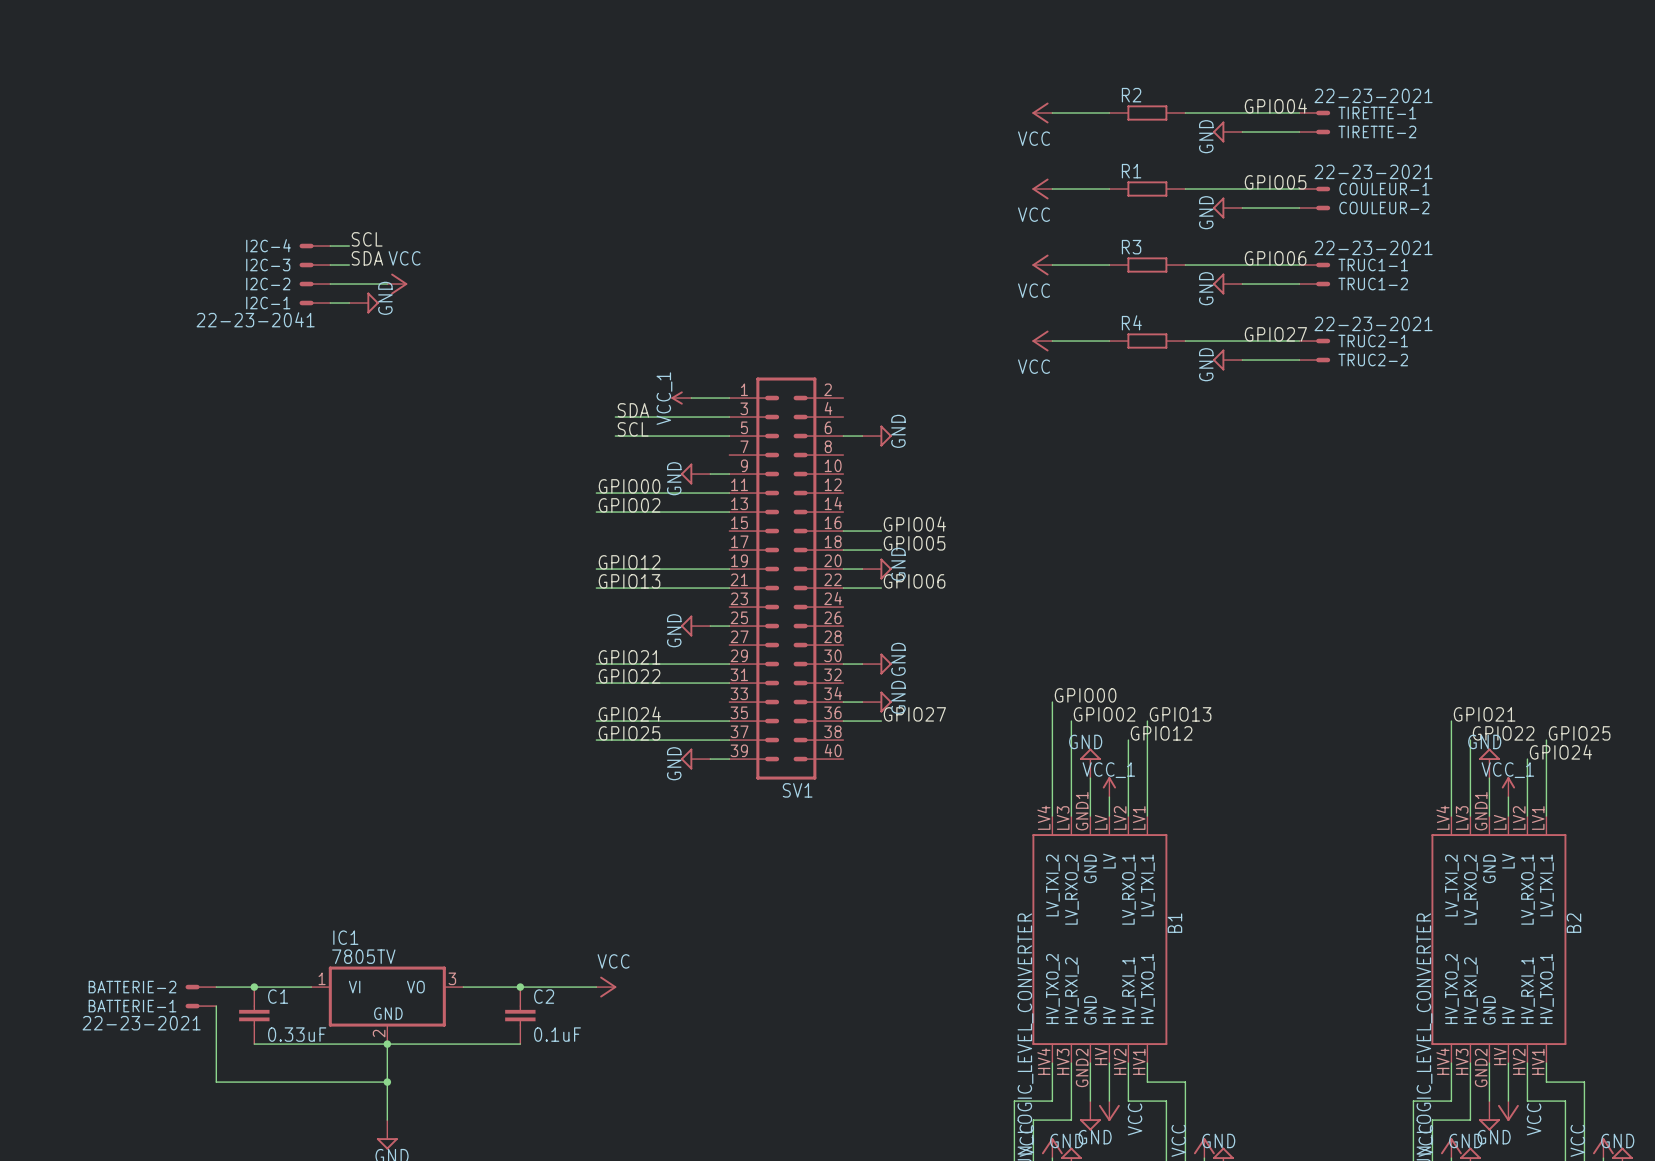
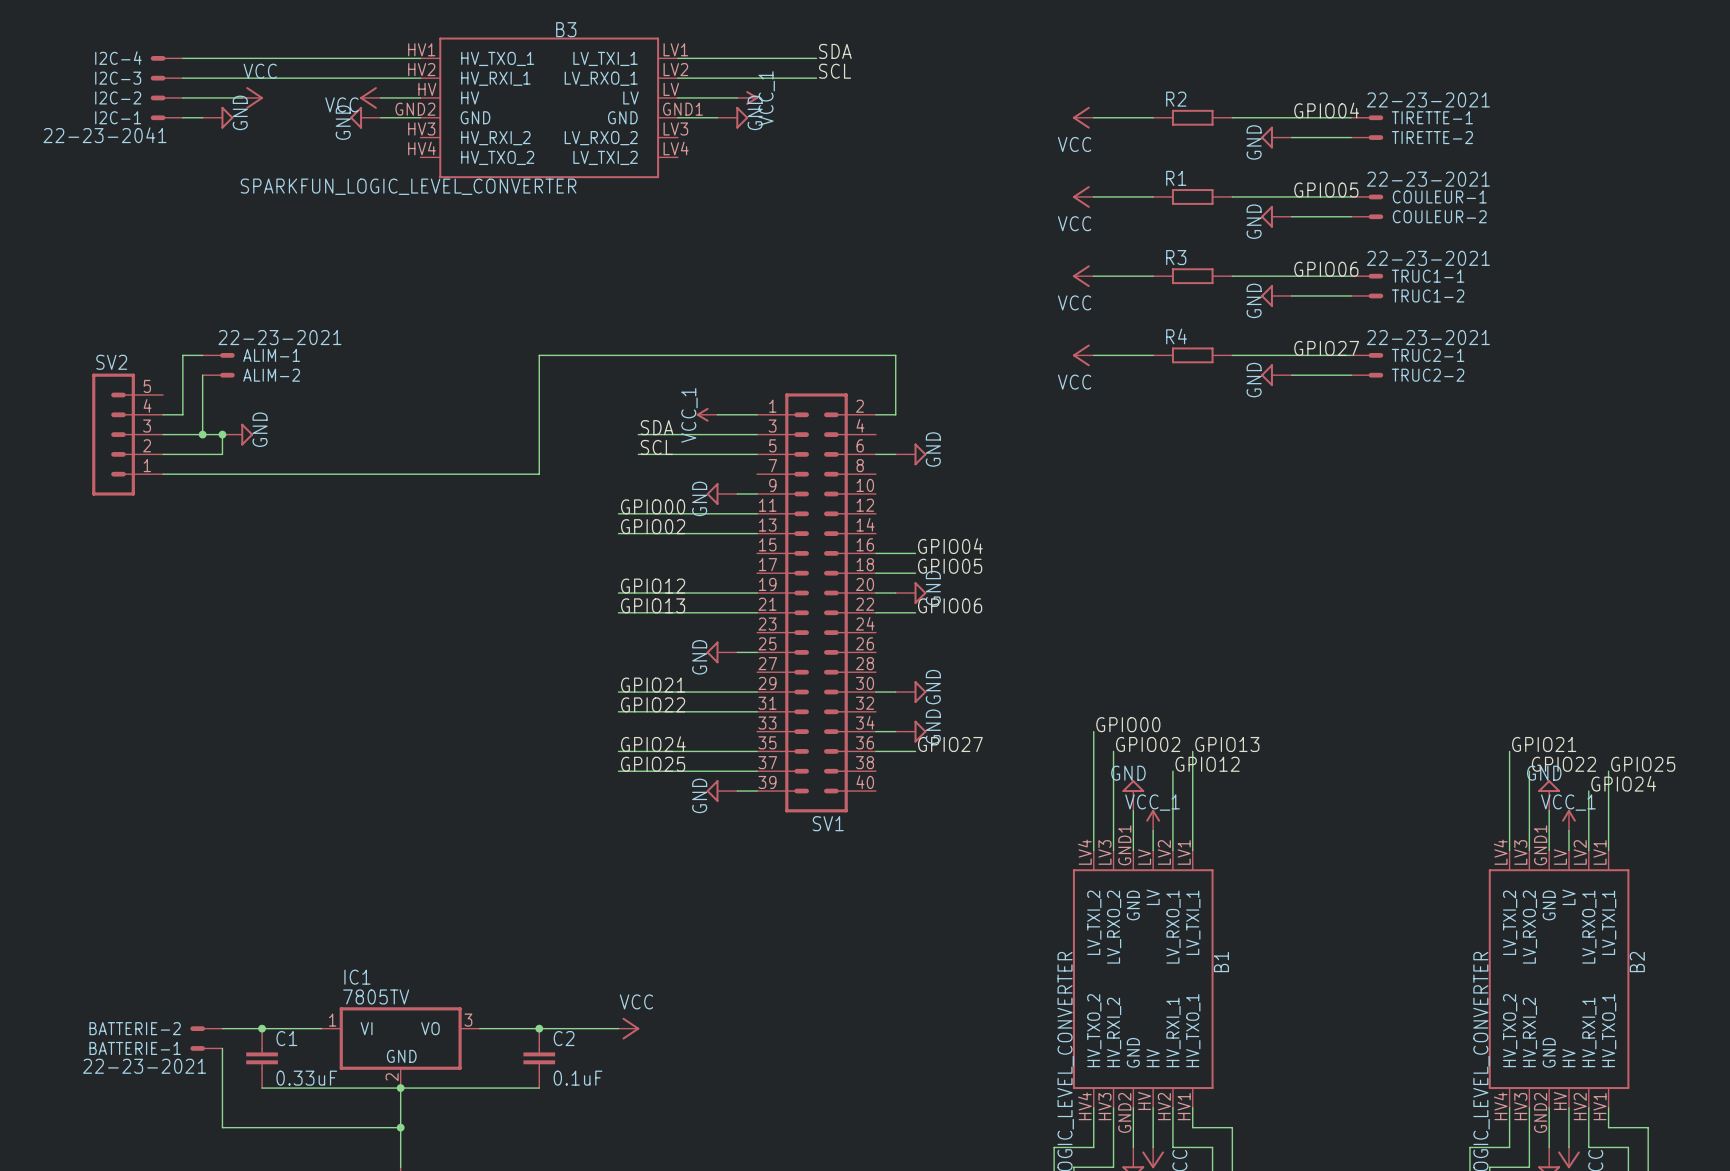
label: none -> SDA (835, 51)
wire: none -> (182, 58) (420, 58)
wire: none -> (677, 58) (816, 58)
label: none -> SCL (835, 71)
wire: none -> (182, 78) (420, 78)
wire: none -> (677, 78) (816, 78)
wire: none -> (182, 97) (242, 97)
power symbol: none -> VCC (252, 97)
power symbol: none -> VCC (370, 97)
wire: none -> (380, 97) (420, 97)
wire: none -> (677, 97) (737, 97)
power symbol: none -> VCC_1 (747, 97)
B3: none -> SPARKFUN_LOGIC_LEVEL_CONVERTER (549, 107)
wire: none -> (182, 117) (202, 117)
power symbol: none -> GND (218, 117)
power symbol: none -> GND (365, 117)
wire: none -> (380, 117) (420, 117)
wire: none -> (677, 117) (717, 117)
power symbol: none -> GND (732, 117)
label: SCL (367, 239) -> none
I2C-4 position: (314, 246) -> (166, 58)
wire: (330, 246) (349, 246) -> none
label: SDA (367, 258) -> none
I2C-3 position: (314, 265) -> (166, 78)
wire: (330, 265) (349, 265) -> none
I2C-2 position: (314, 284) -> (166, 97)
wire: (330, 284) (387, 284) -> none
power symbol: VCC (397, 284) -> none
I2C-1 position: (314, 303) -> (166, 117)
wire: (330, 303) (349, 303) -> none
power symbol: GND (364, 303) -> none
wire: none -> (202, 355) (182, 355) (182, 414) (163, 414)
ALIM-1: none -> 22-23-2021 (218, 355)
wire: none -> (202, 375) (202, 434)
ALIM-2: none -> (218, 375)
wire: none -> (875, 414) (895, 414) (895, 355) (539, 355) (539, 474) (163, 474)
SV2: none -> (127, 434)
wire: none -> (163, 434) (222, 434) (222, 454) (163, 454)
junction: none -> (202, 434)
junction: none -> (222, 434)
power symbol: none -> GND (237, 434)

